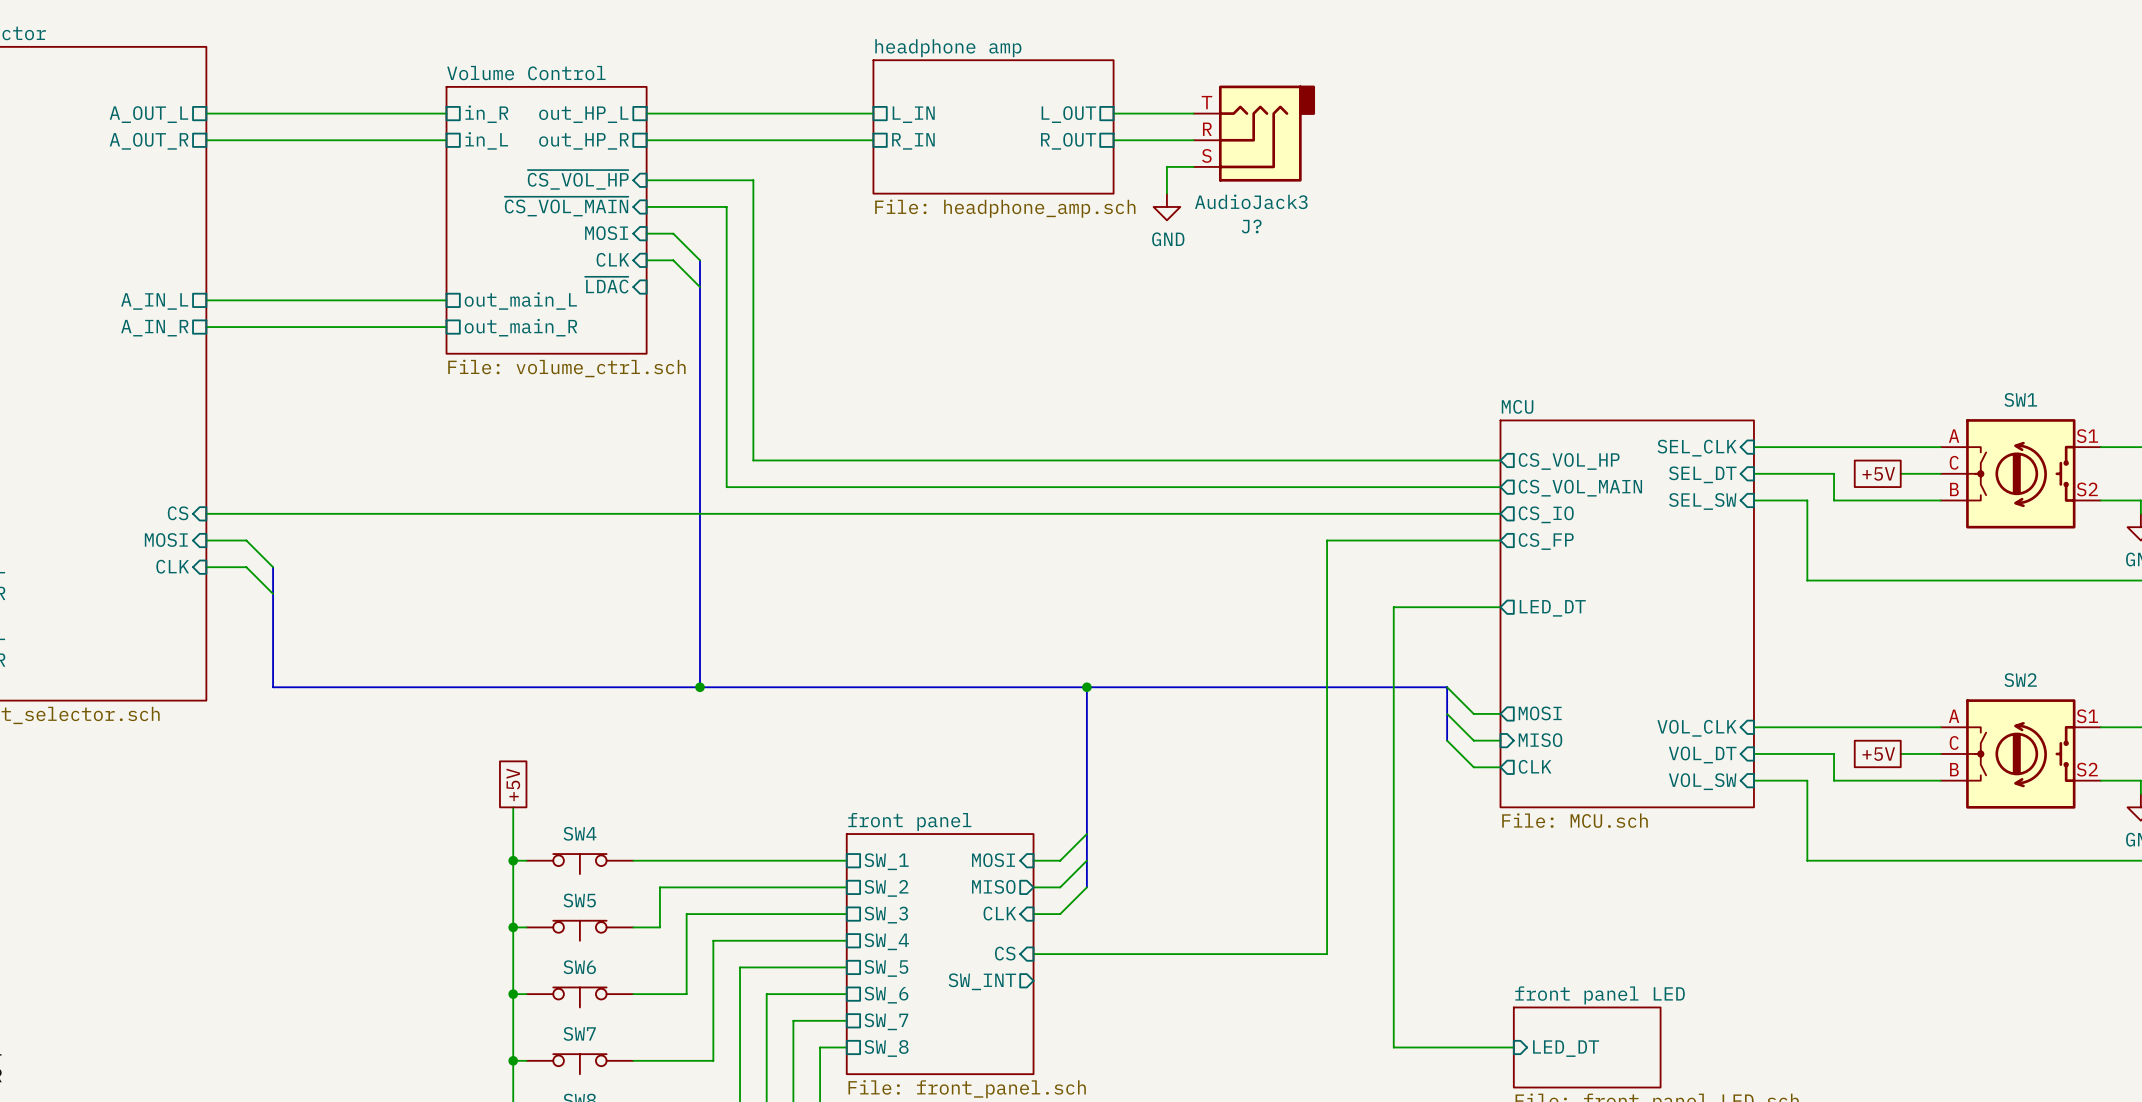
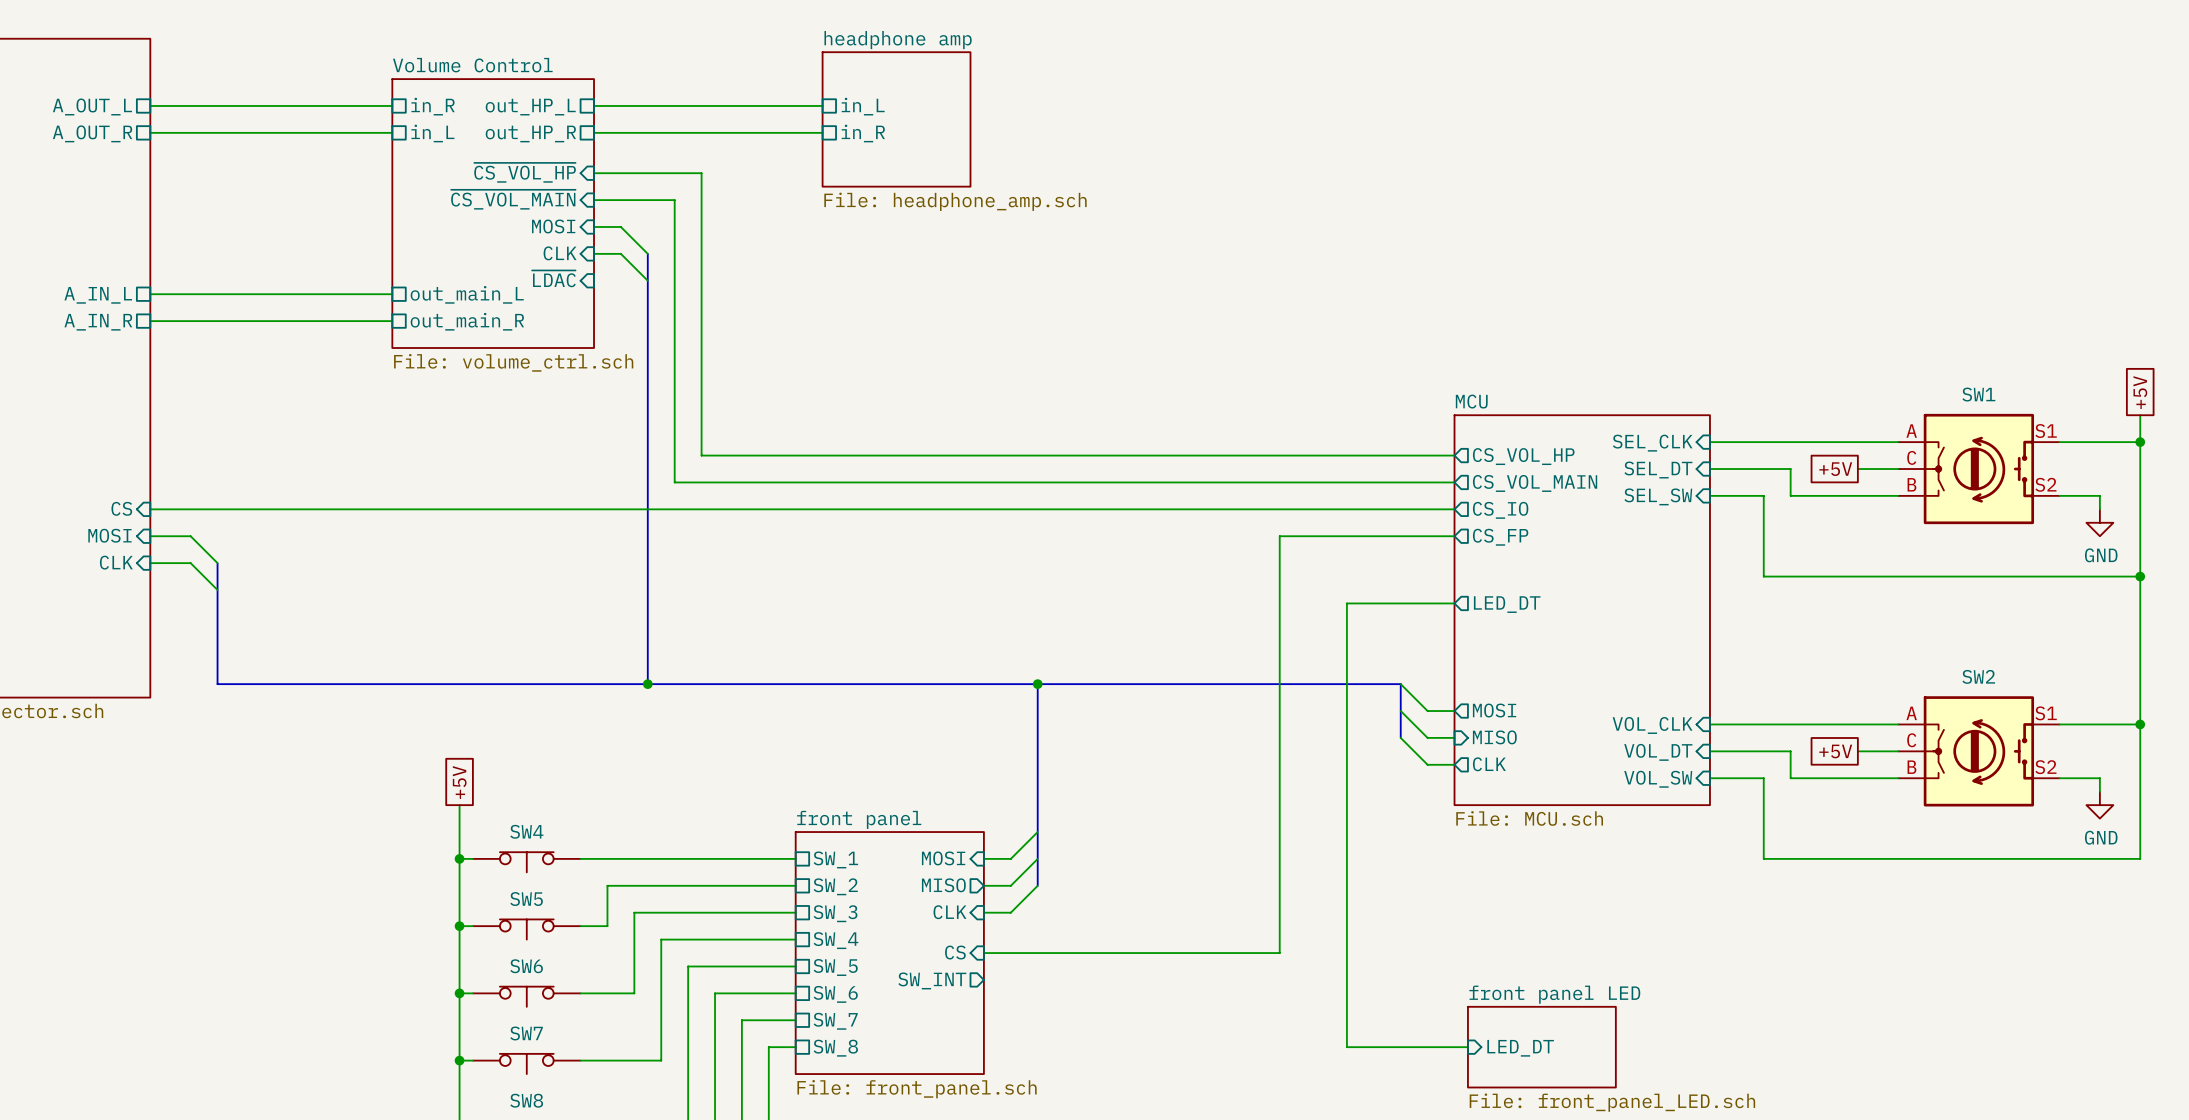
wire: (1113, 113) (1193, 113) -> none
sheet pin: L_IN (913, 114) -> in_L (863, 106)
sheet pin: L_OUT (1068, 114) -> none
sheet headphone amp: none -> File: headphone_amp.sch (896, 119)
sheet headphone amp: File: headphone_amp.sch (993, 126) -> none
J?: AudioJack3 (1254, 133) -> none
wire: (1113, 140) (1193, 140) -> none
sheet pin: R_IN (913, 141) -> in_R (863, 133)
sheet pin: R_OUT (1068, 141) -> none
wire: (1193, 166) (1166, 166) (1166, 193) -> none
power symbol: GND (1166, 206) -> none

